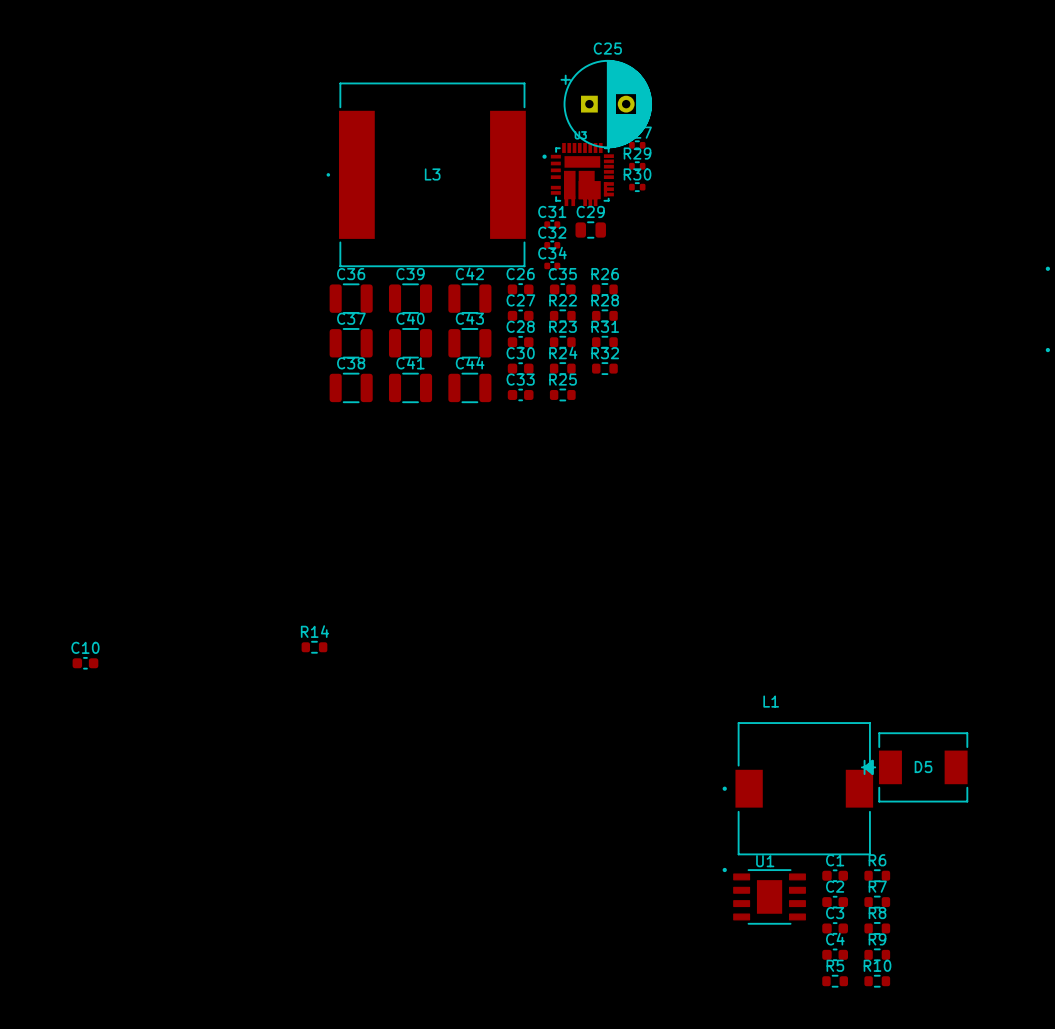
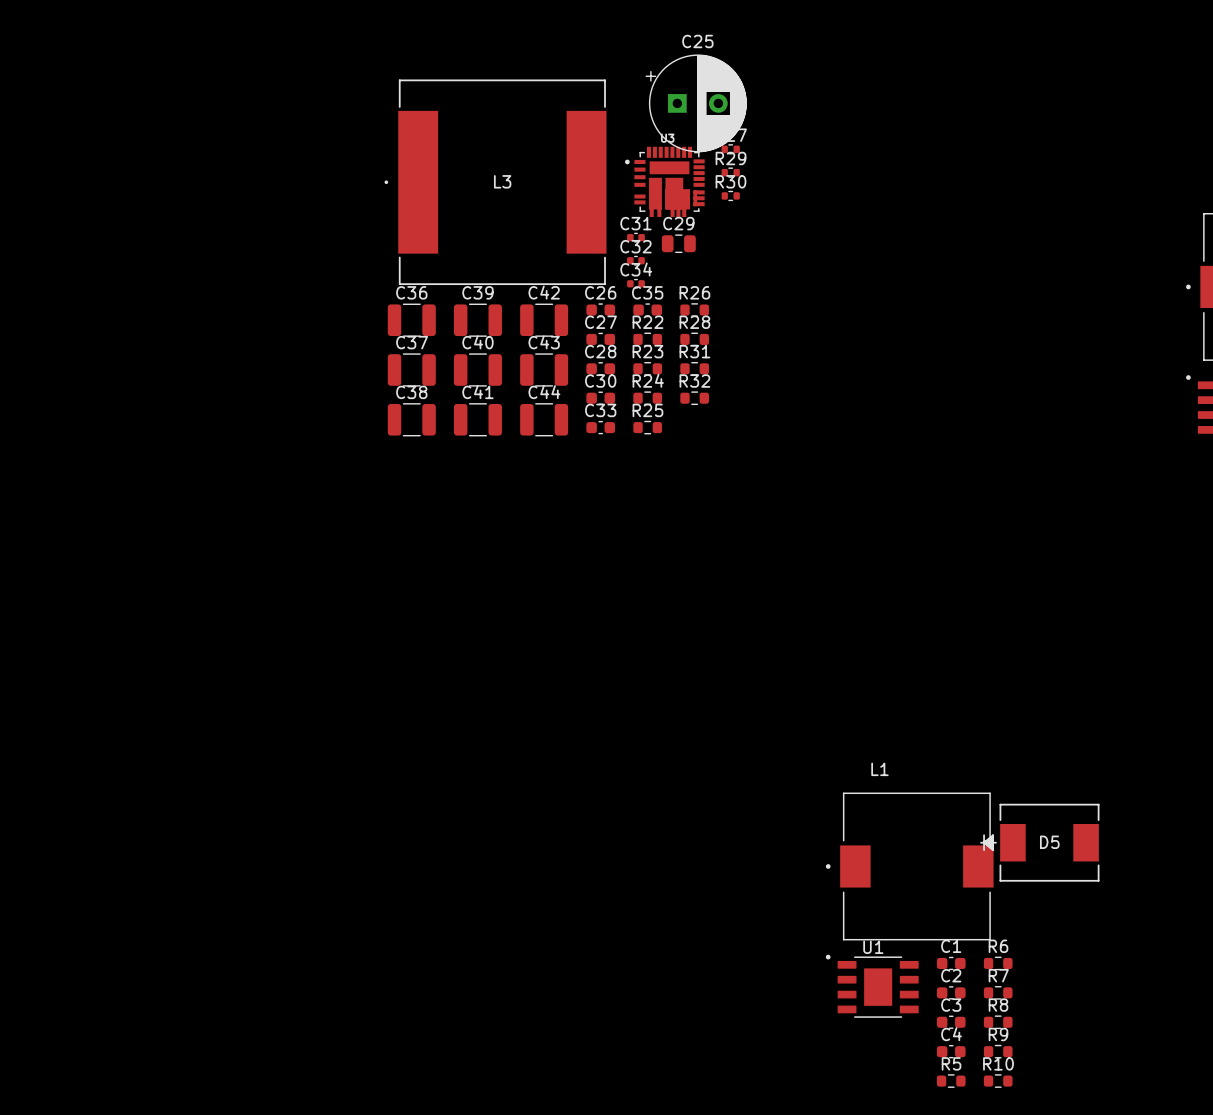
R14: (314, 647) -> none
C10: (85, 663) -> none

